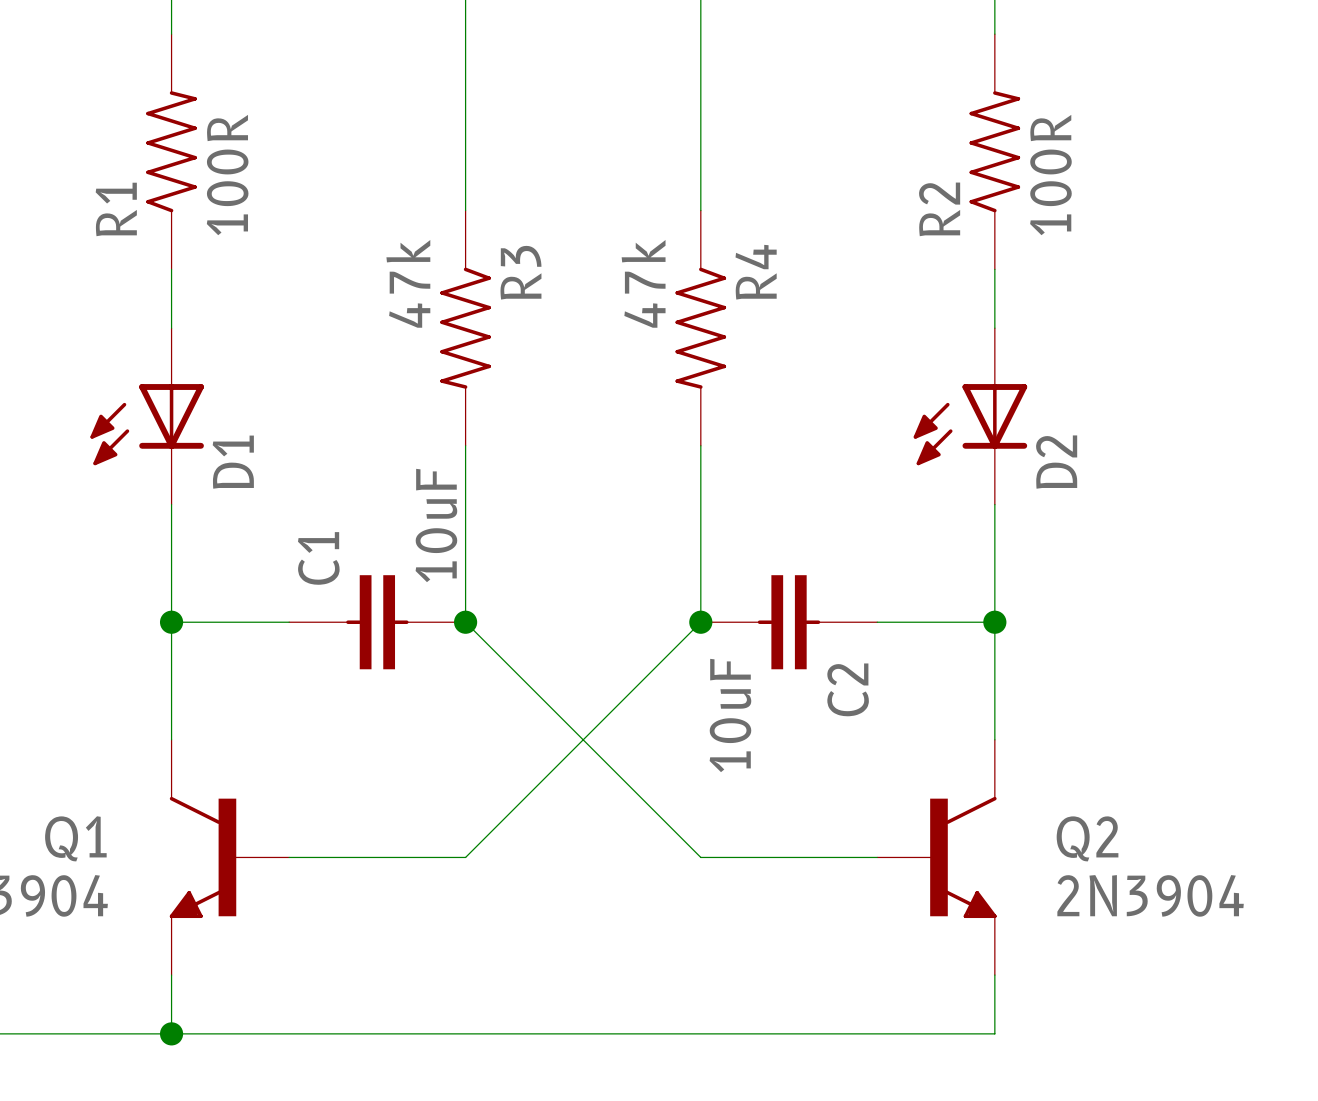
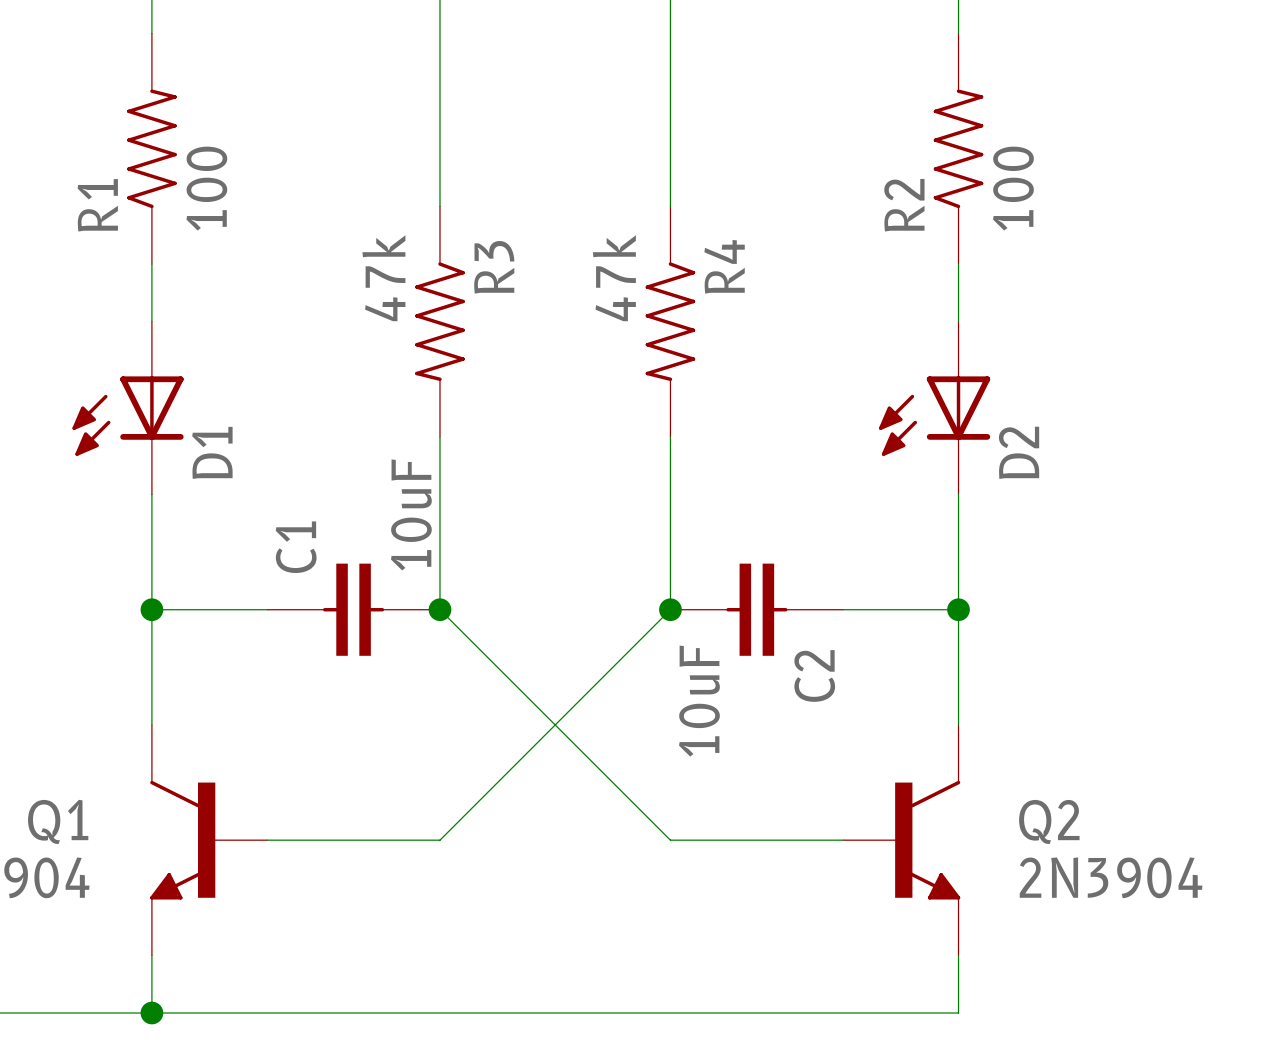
R1 value: 100R (227, 175) -> 100 (206, 188)
R2 value: 100R (1050, 175) -> 100 (1013, 188)

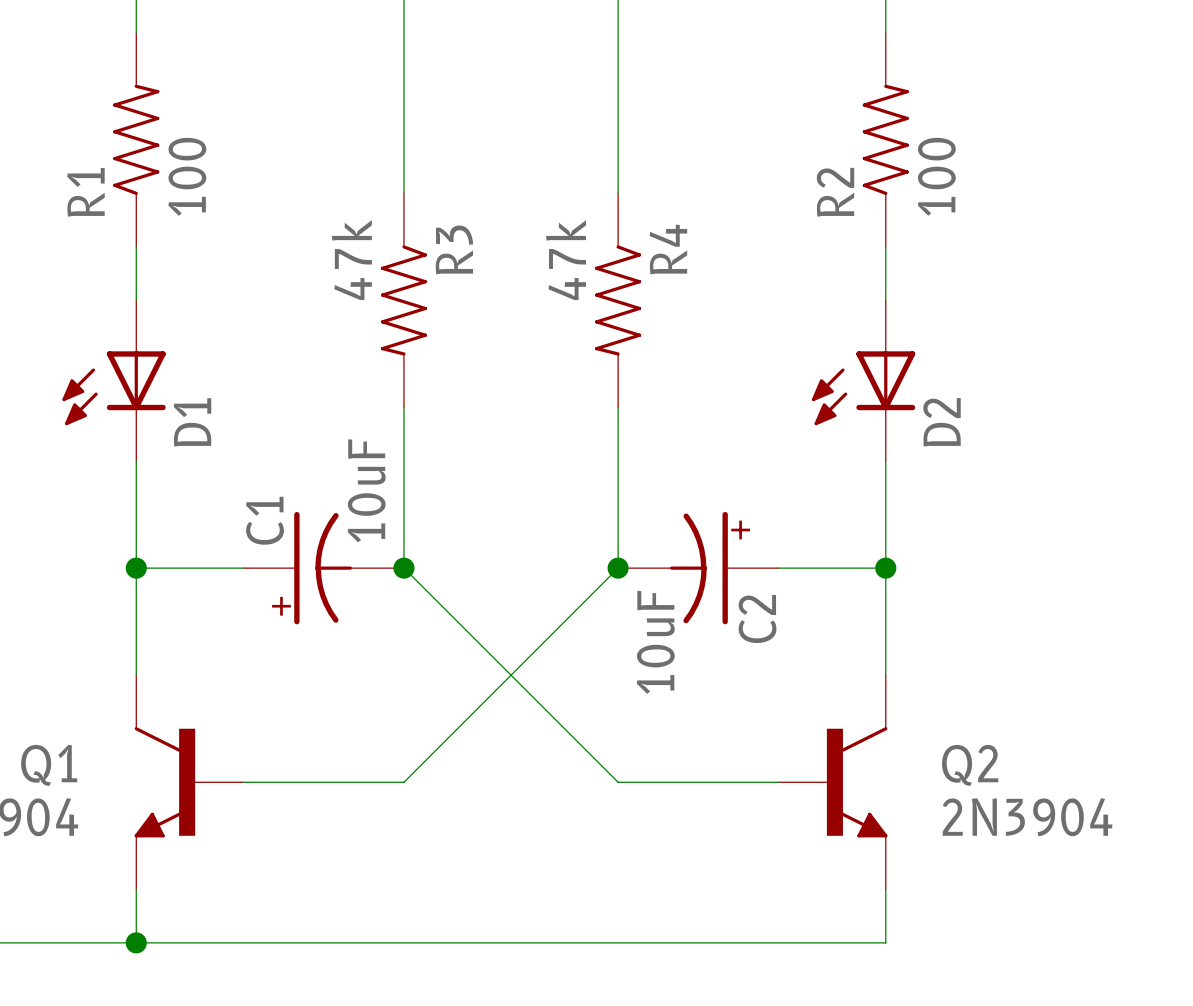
C1 symbol: [267, 563, 440, 656] -> [243, 511, 404, 625]
C2 symbol: [670, 563, 844, 656] -> [618, 511, 779, 625]

